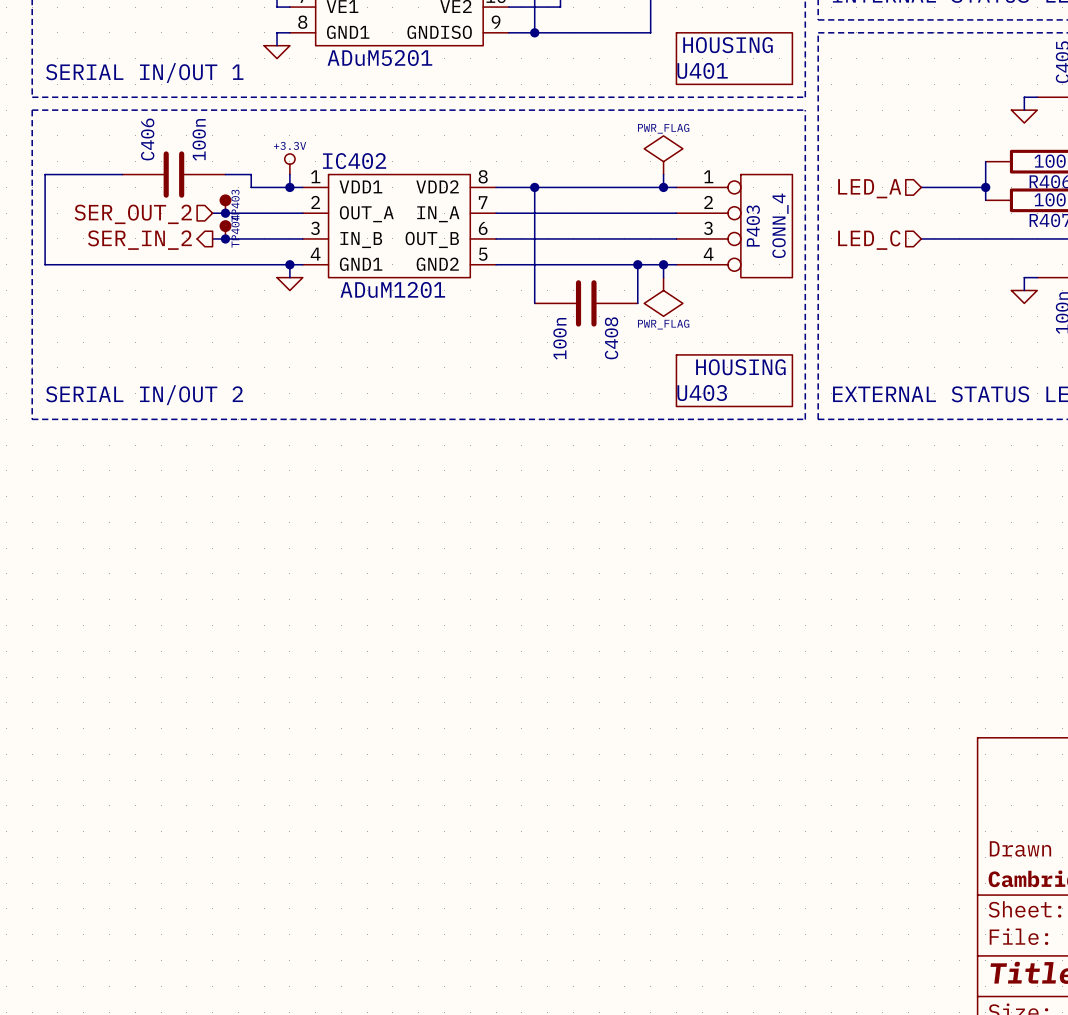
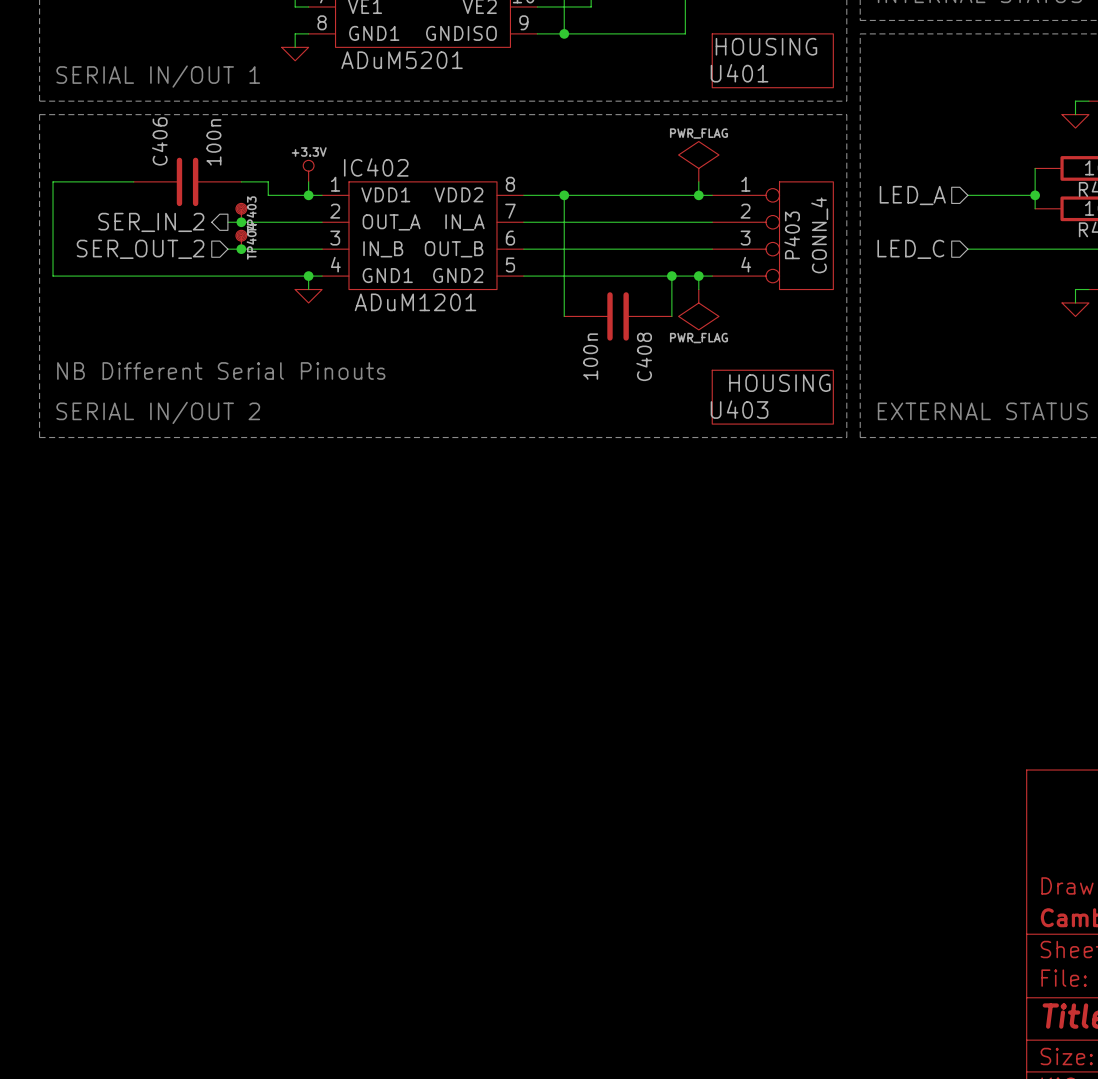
hierarchical label shape: input (133, 214) -> output (151, 222)
hierarchical label: SER_OUT_2 (133, 214) -> SER_IN_2 (151, 222)
hierarchical label shape: output (139, 240) -> input (140, 249)
hierarchical label: SER_IN_2 (139, 240) -> SER_OUT_2 (140, 249)
text: none -> NB Different Serial Pinouts (221, 371)

